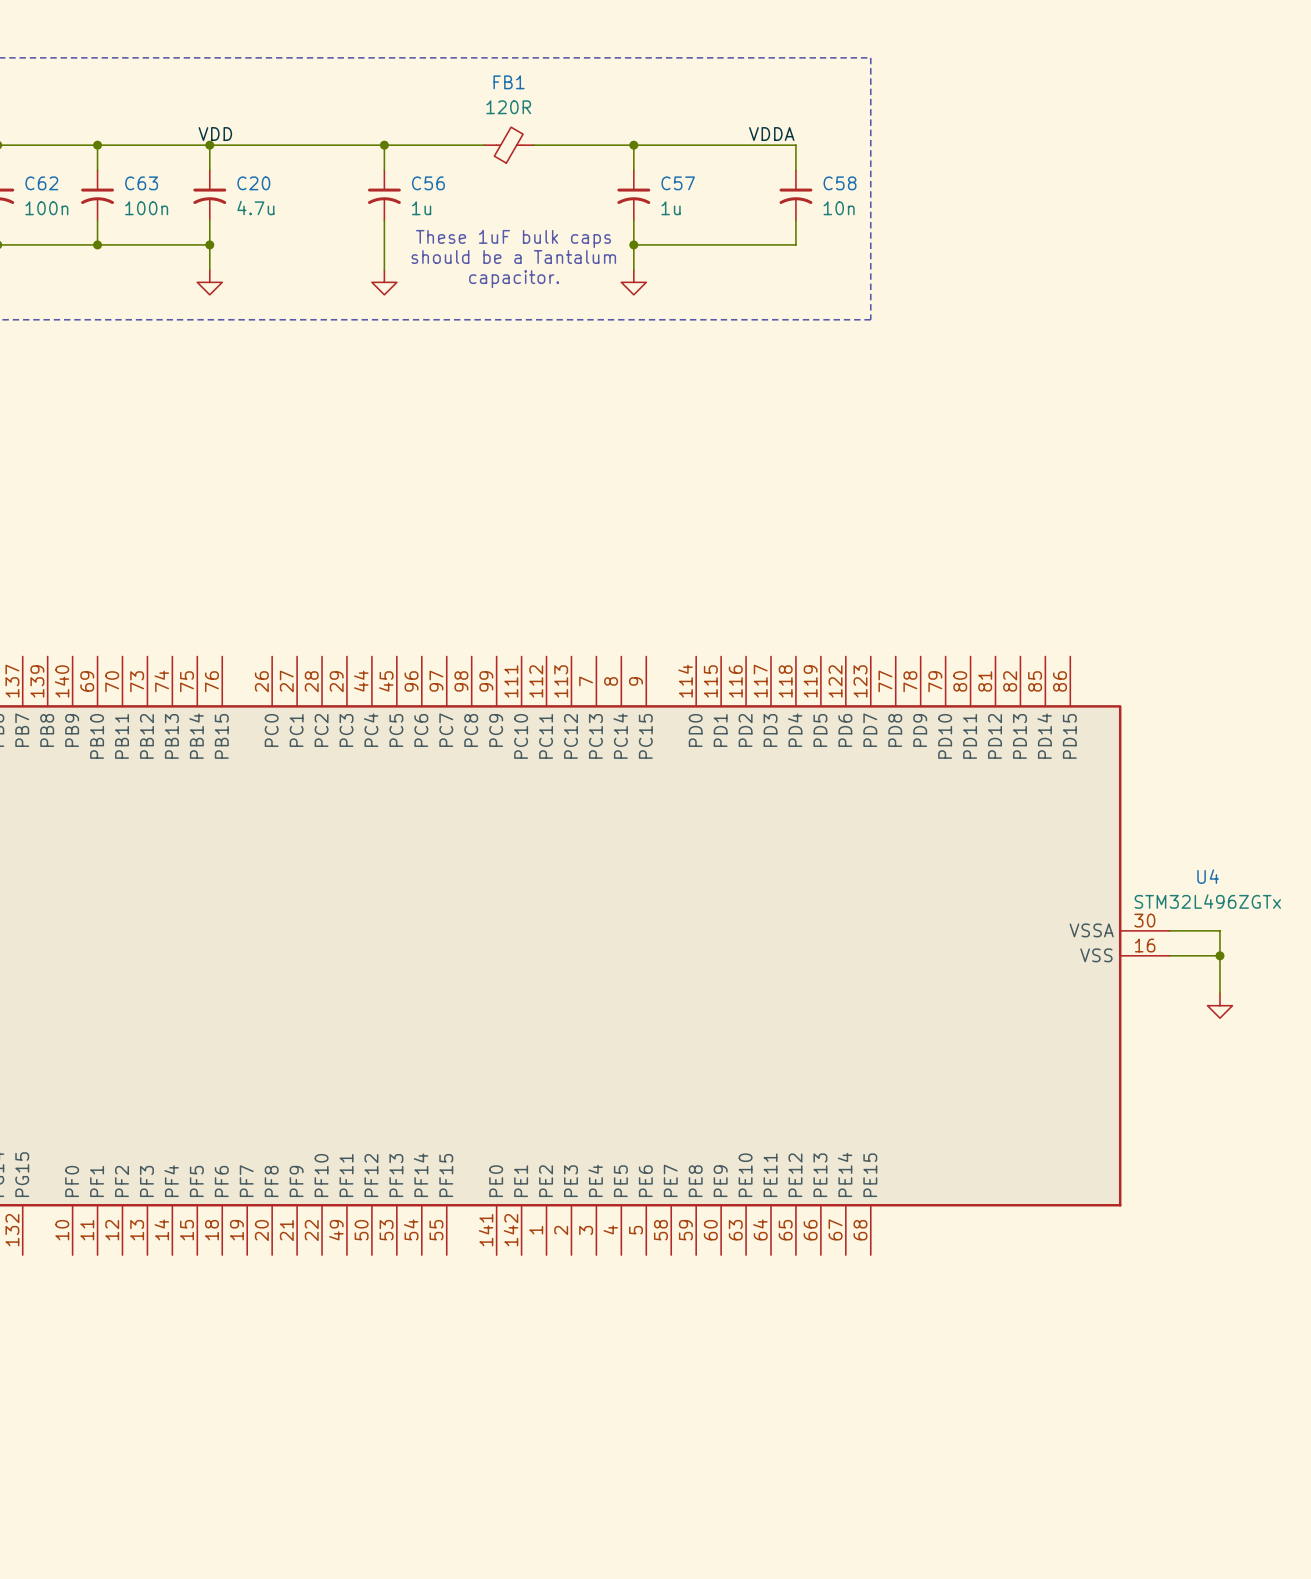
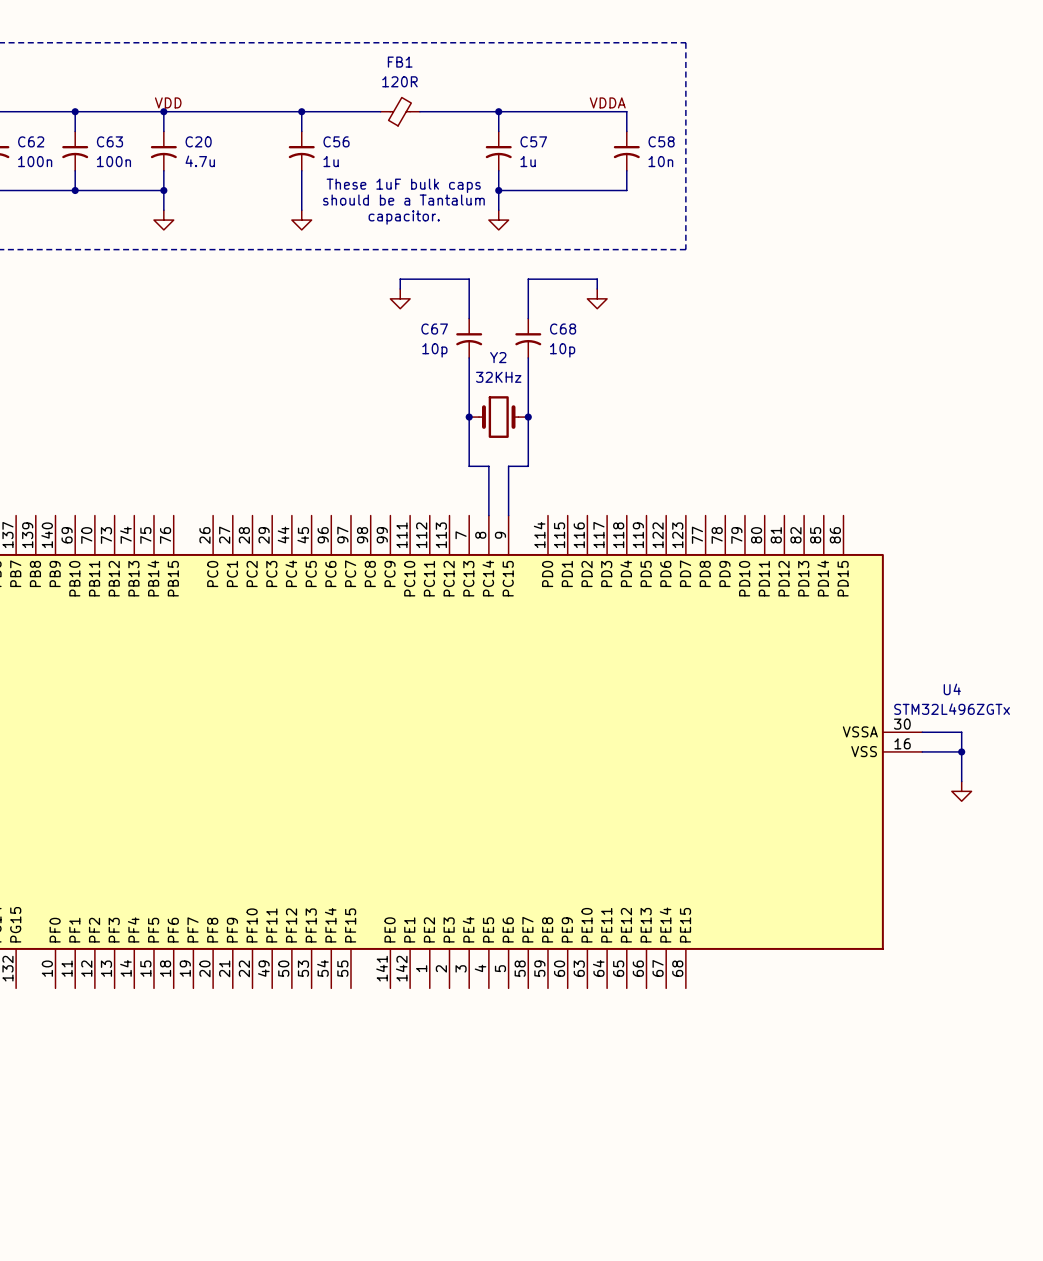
wire: none -> (400, 289) (400, 279) (469, 279) (469, 318)
wire: none -> (597, 289) (597, 279) (528, 279) (528, 318)
power symbol: none -> (400, 298)
power symbol: none -> (597, 298)
C67: none -> 10p (469, 338)
C68: none -> 10p (528, 338)
wire: none -> (469, 357) (469, 466) (488, 466) (488, 515)
wire: none -> (528, 357) (528, 466) (508, 466) (508, 515)
junction: none -> (469, 417)
Y2: none -> 32KHz (498, 417)
junction: none -> (528, 417)

